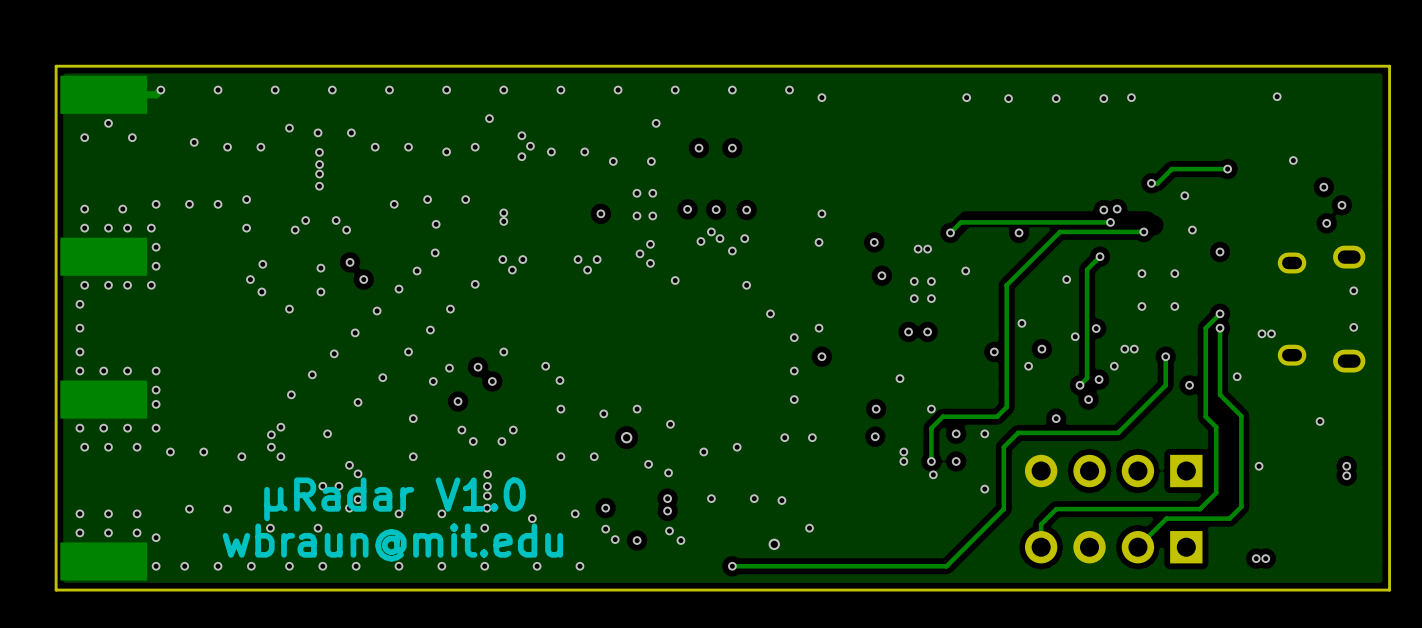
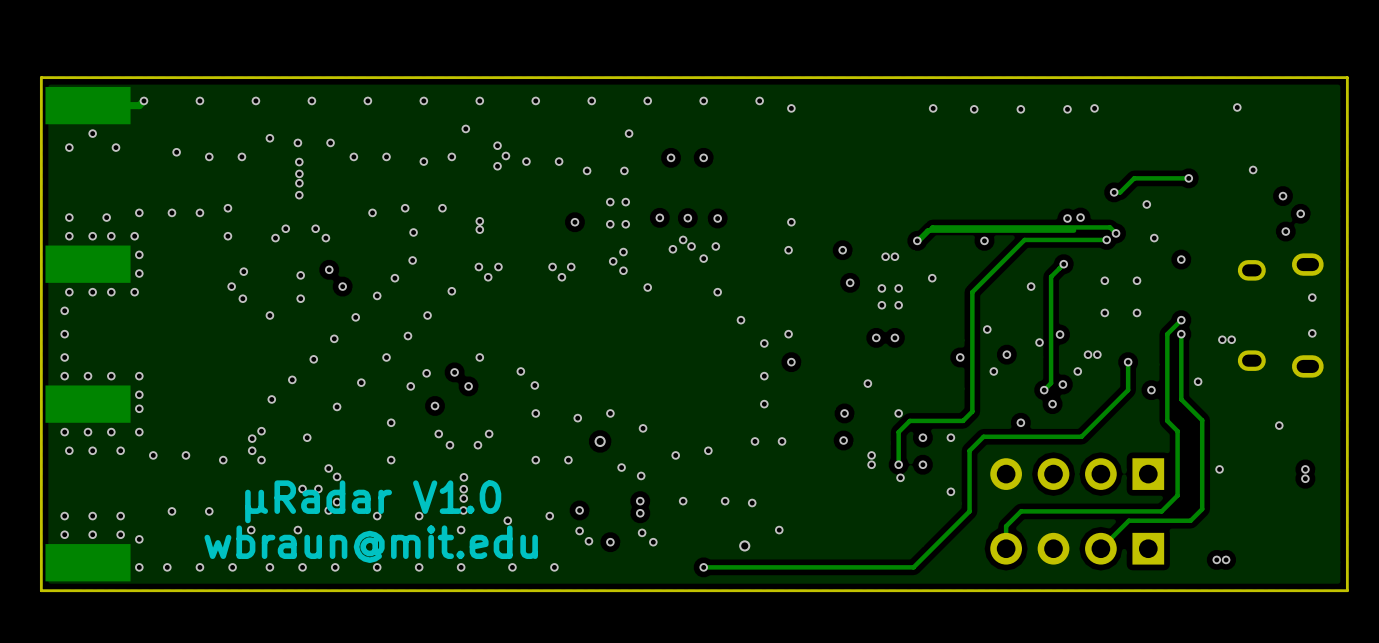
via position: (1110, 222) -> (1116, 233)
track: none -> (1116, 233) (1110, 227) (932, 227) (919, 240)

